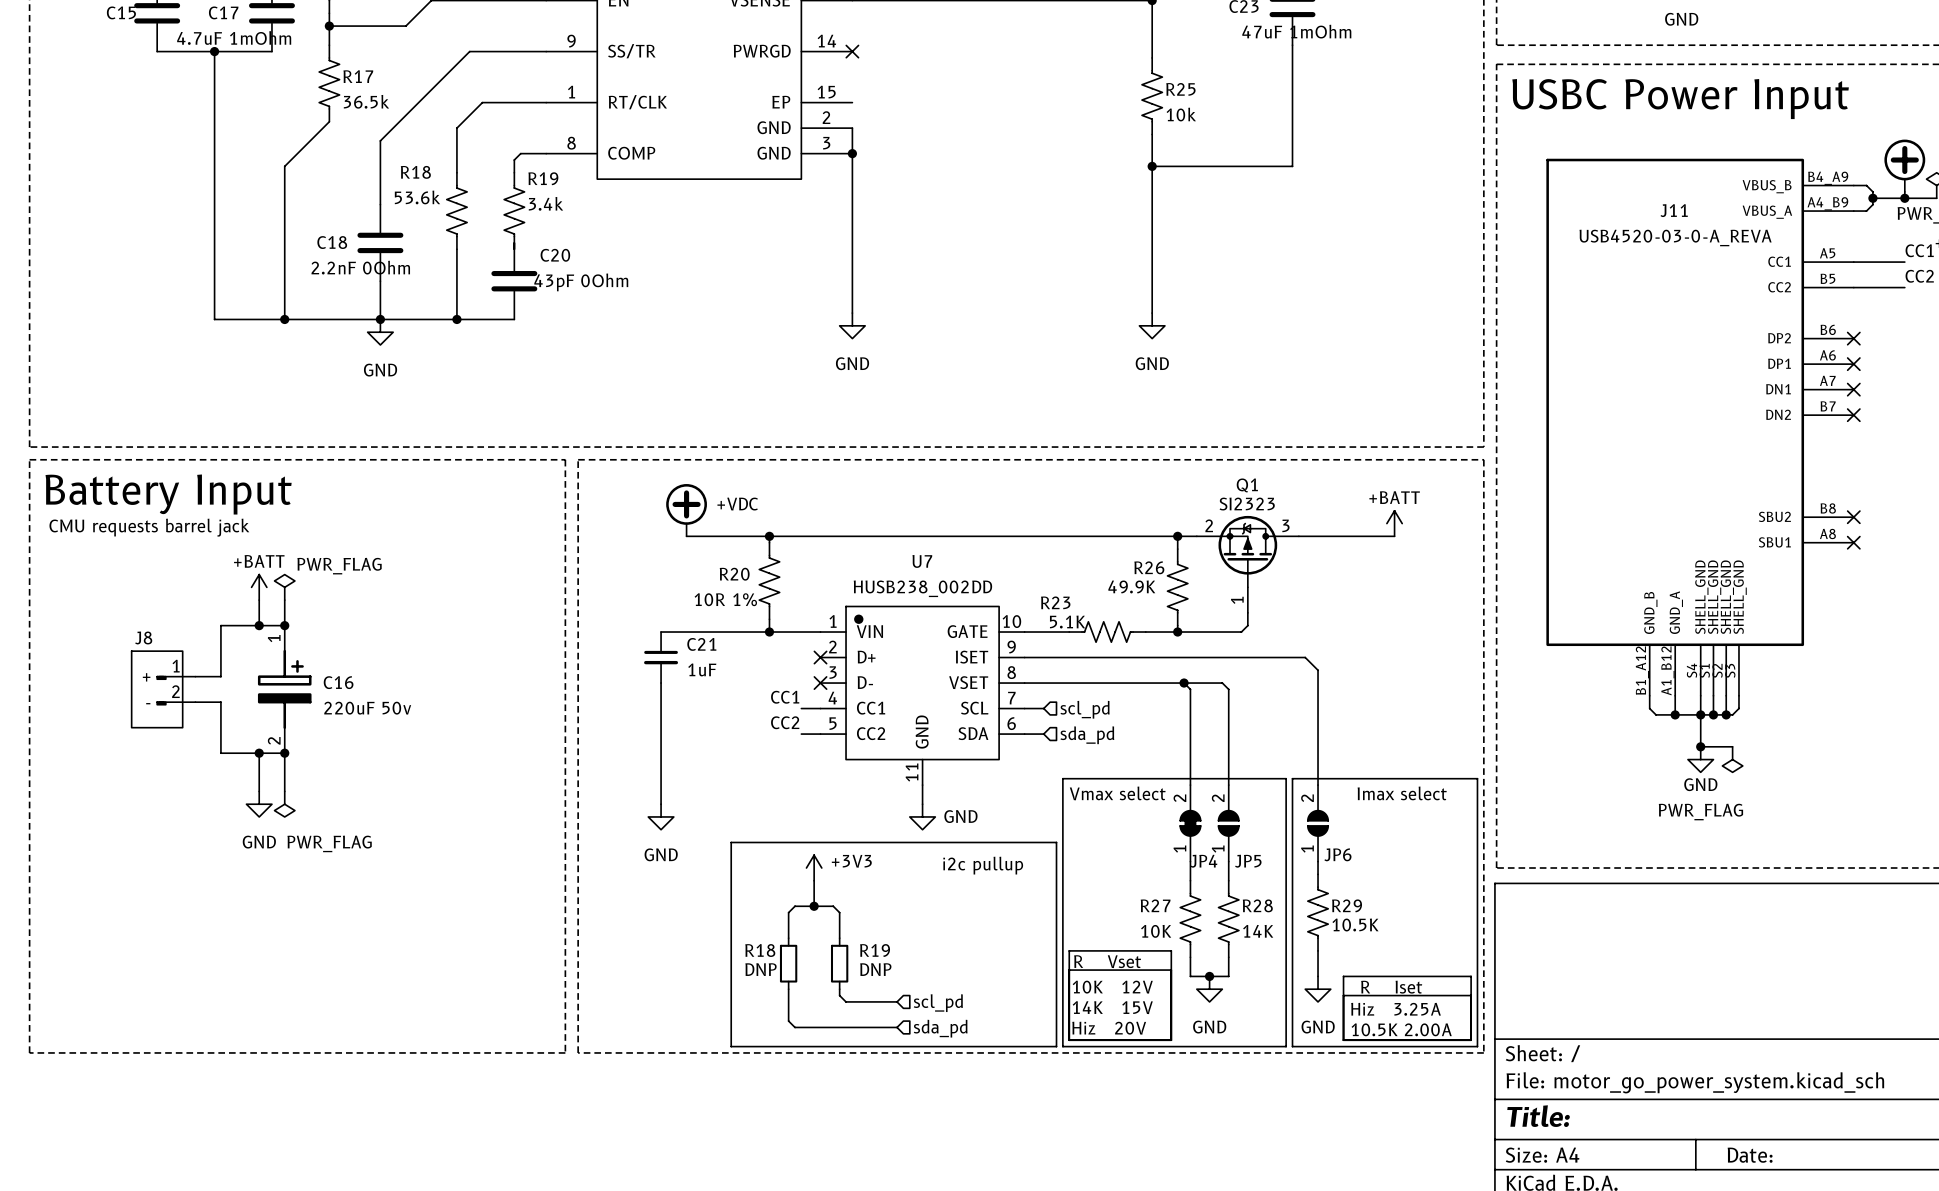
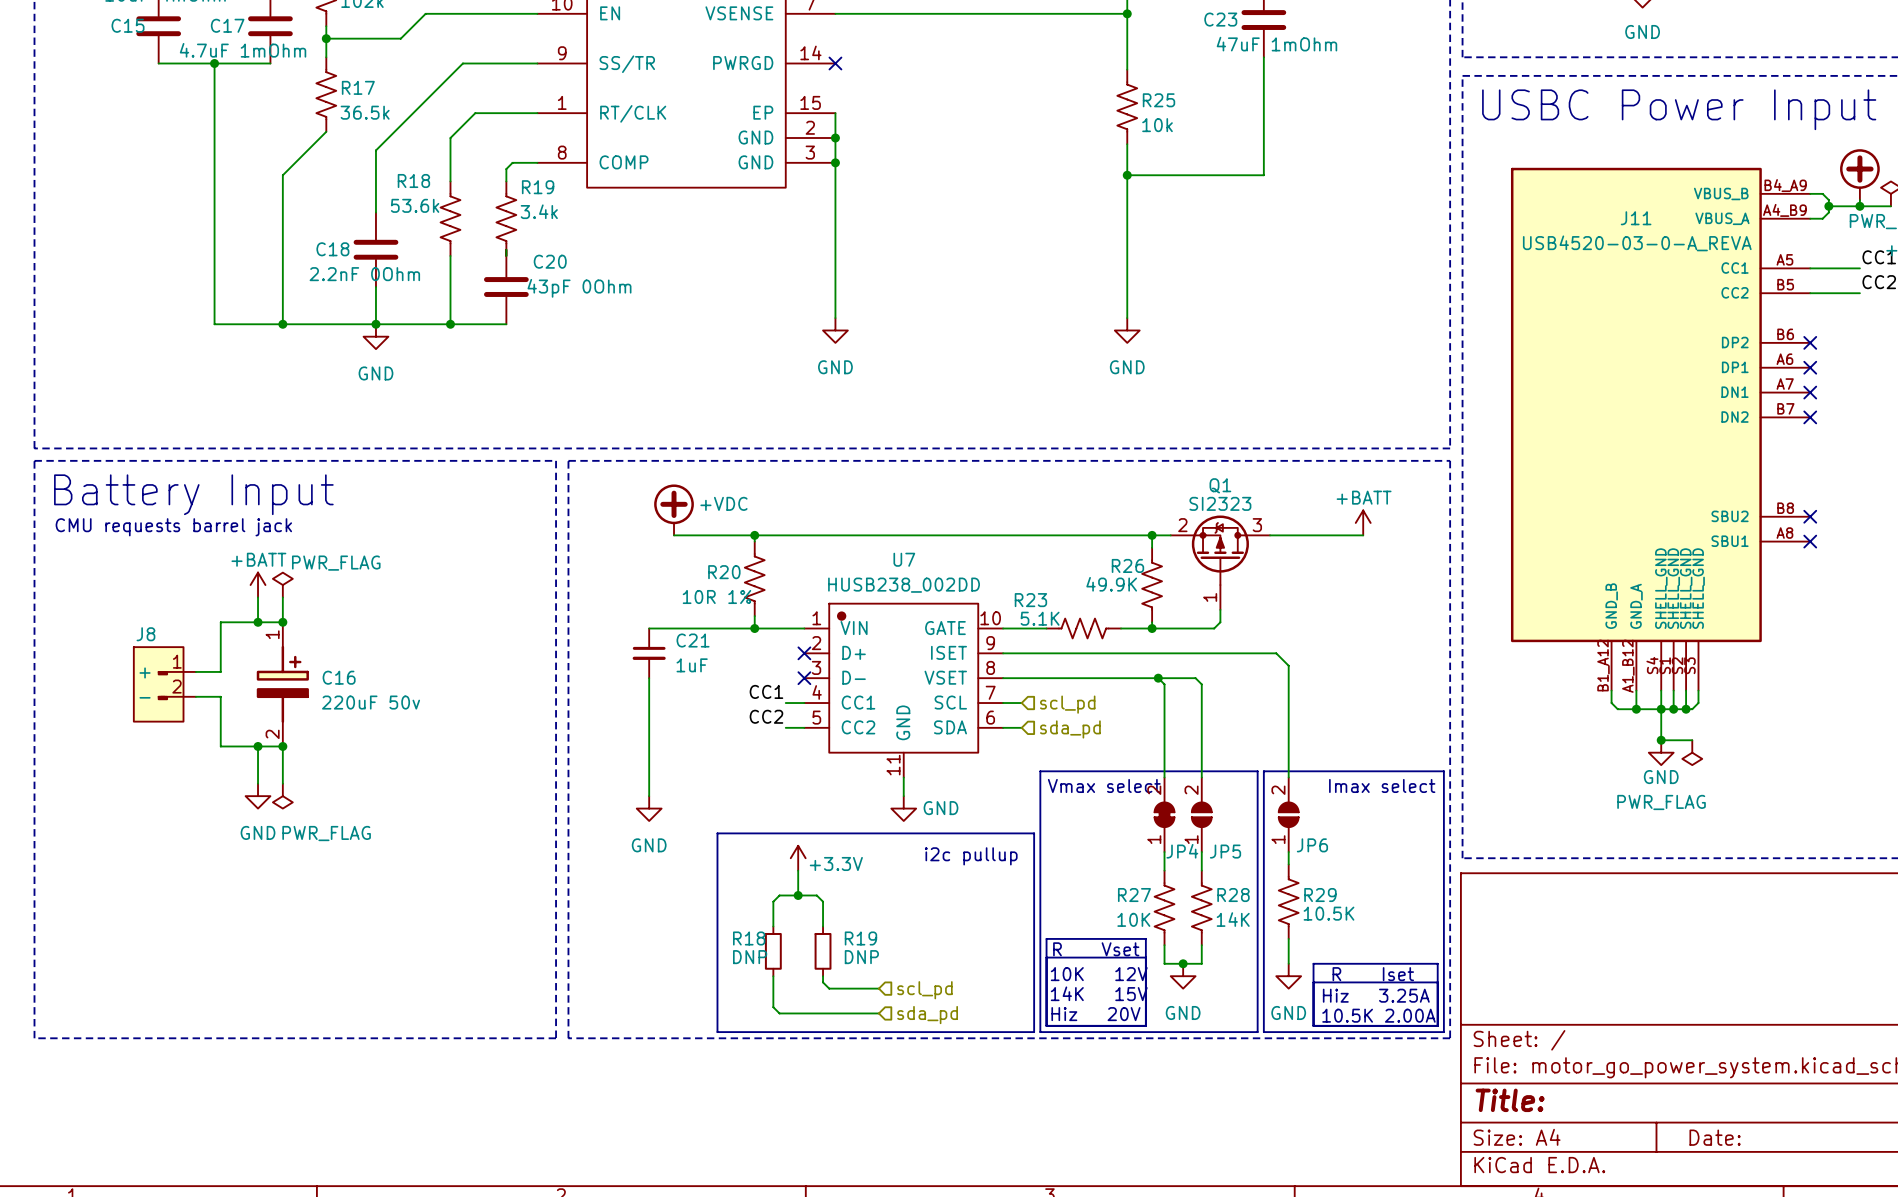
wire: none -> (835, 113) (835, 138)
junction: none -> (835, 138)
power symbol: +3V3 (814, 868) -> +3.3V (798, 858)

